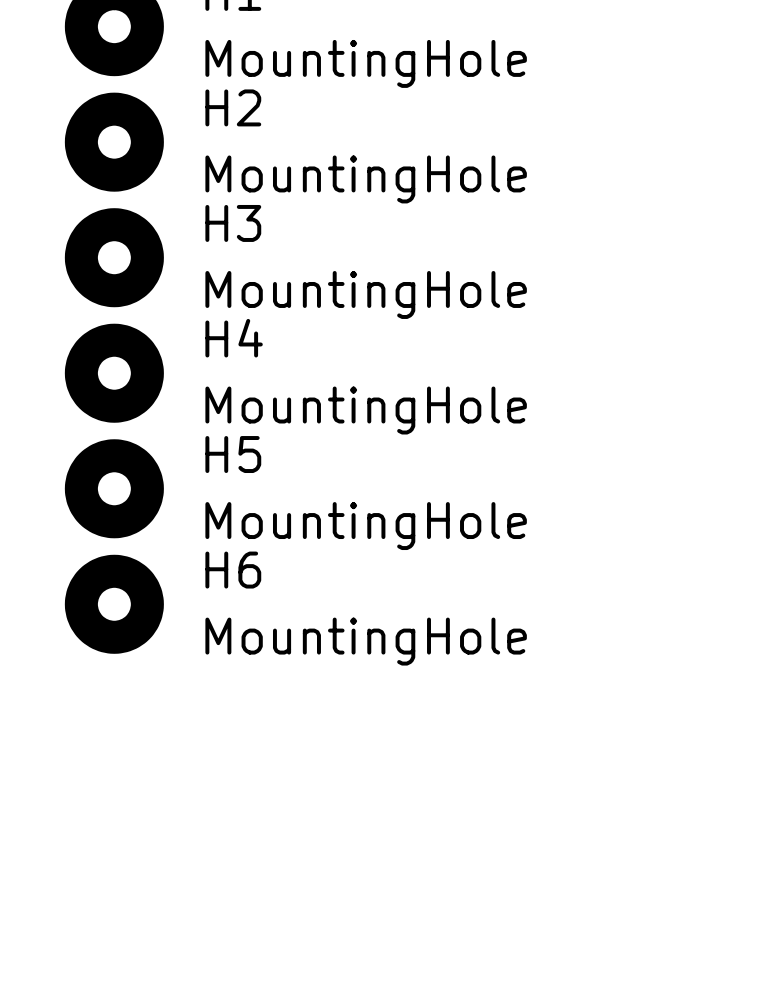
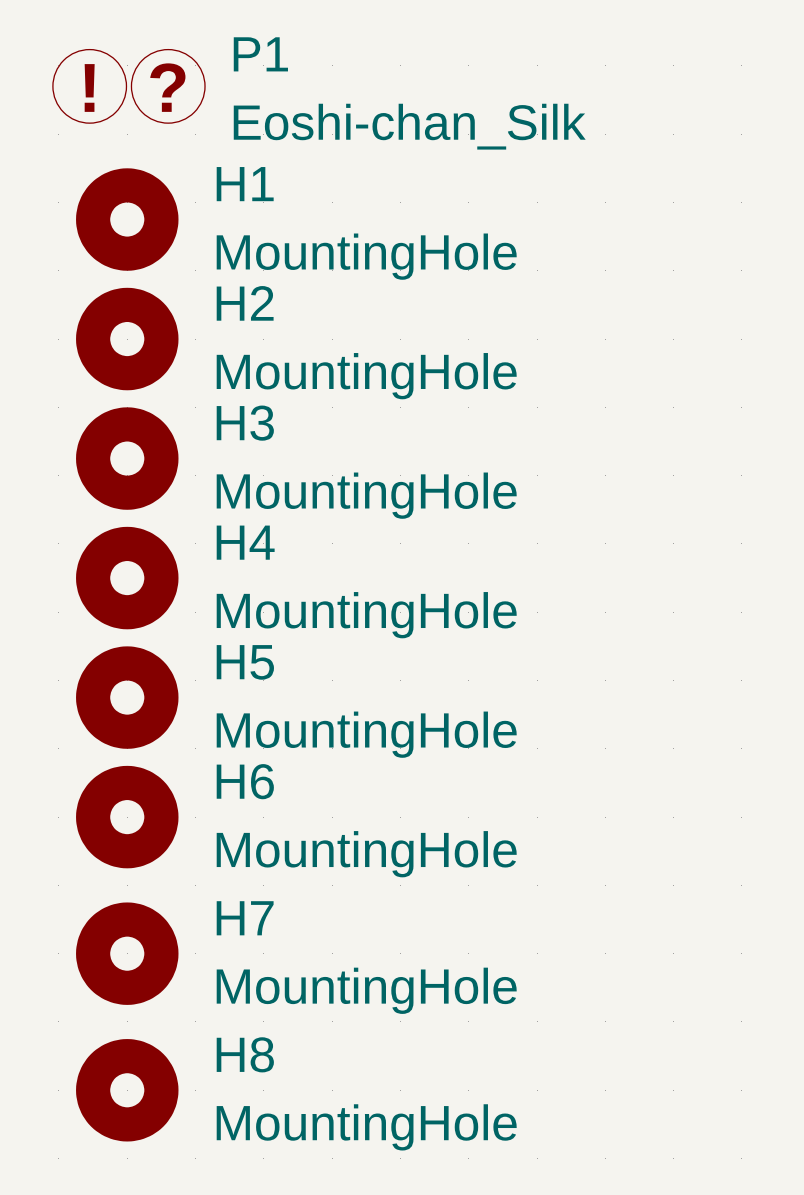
H7: none -> MountingHole (127, 953)
H8: none -> MountingHole (127, 1090)

